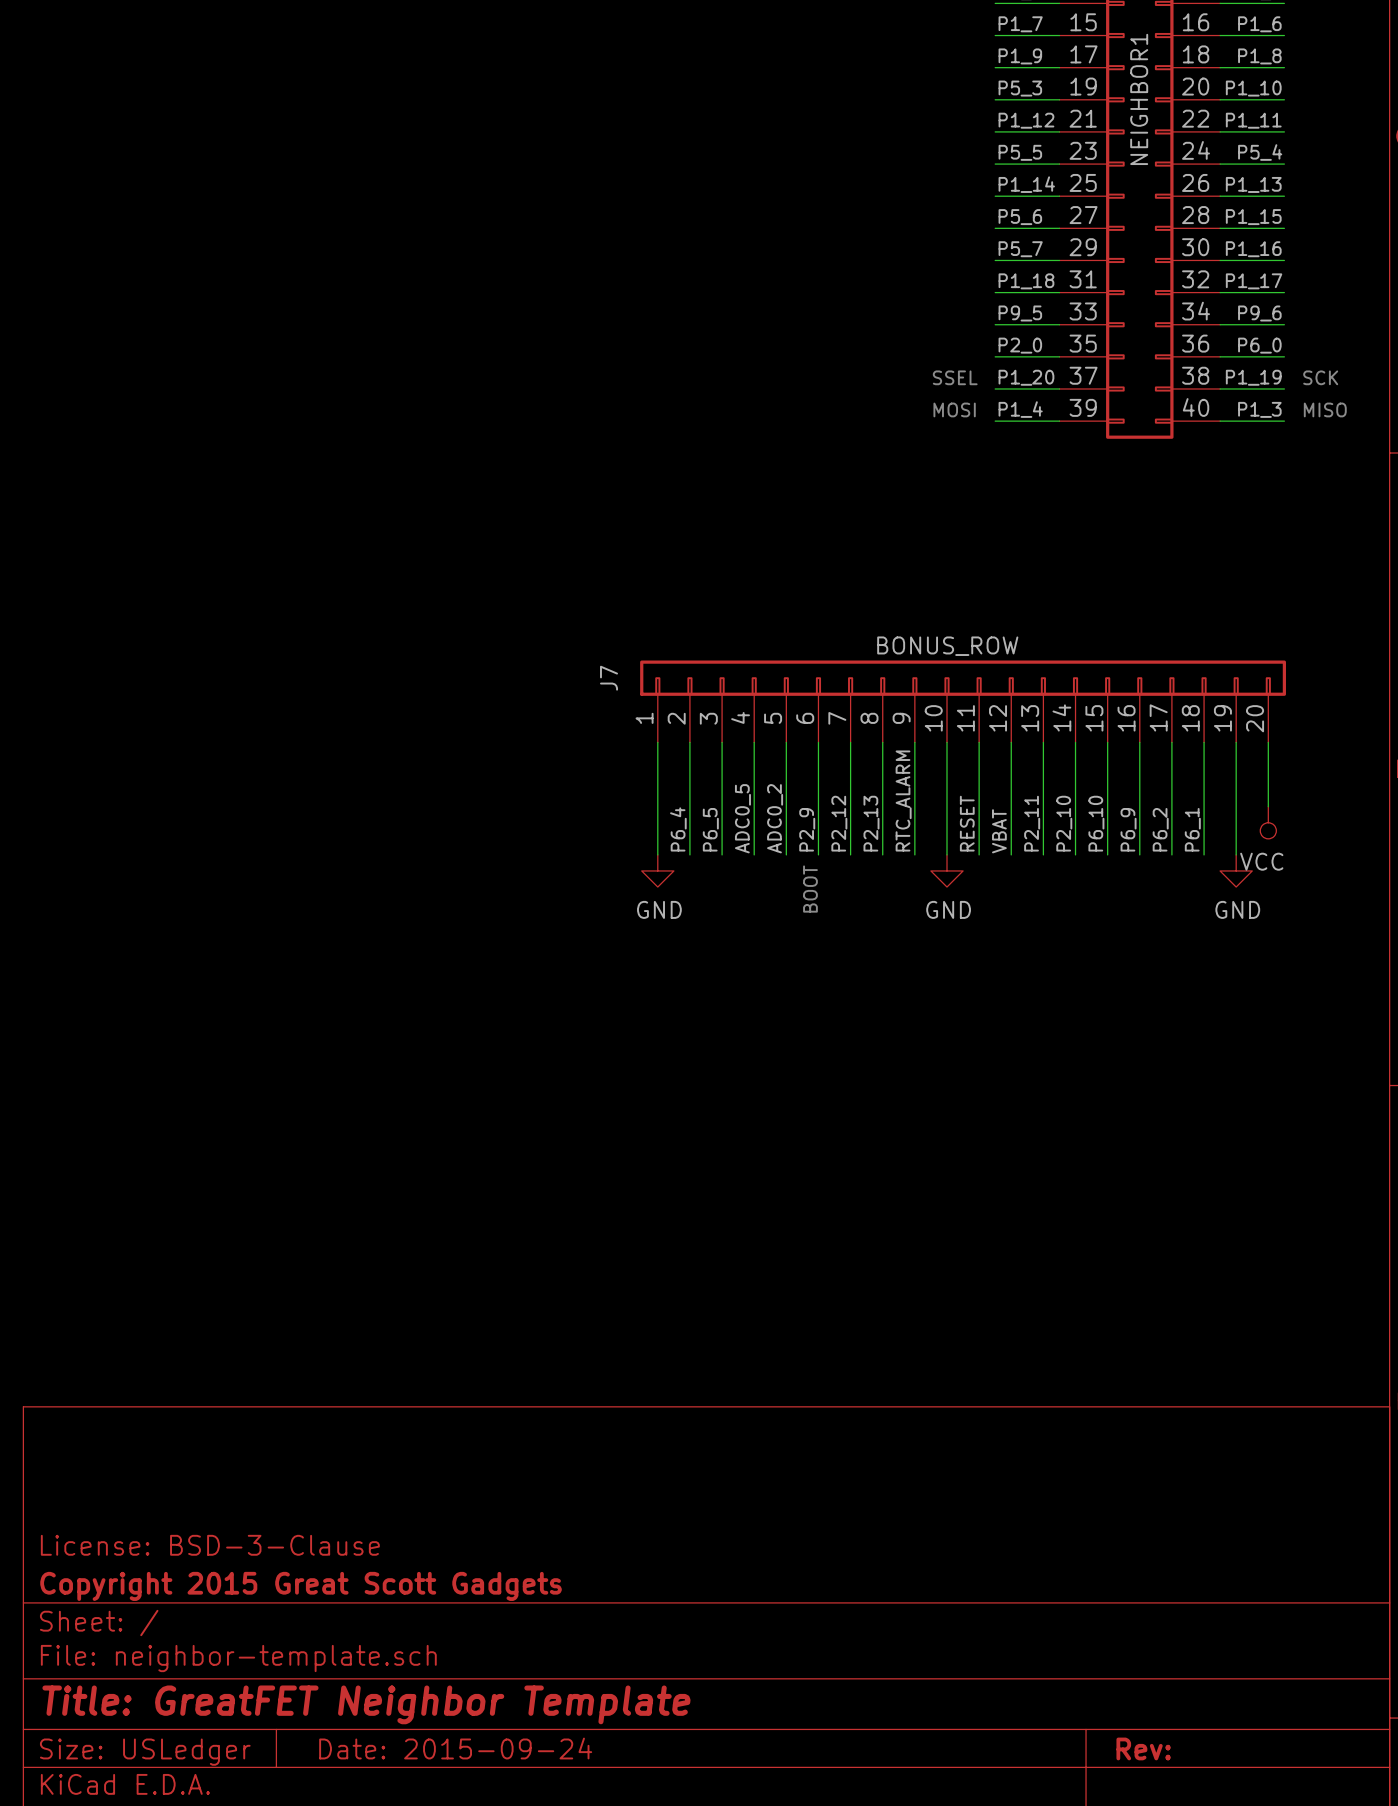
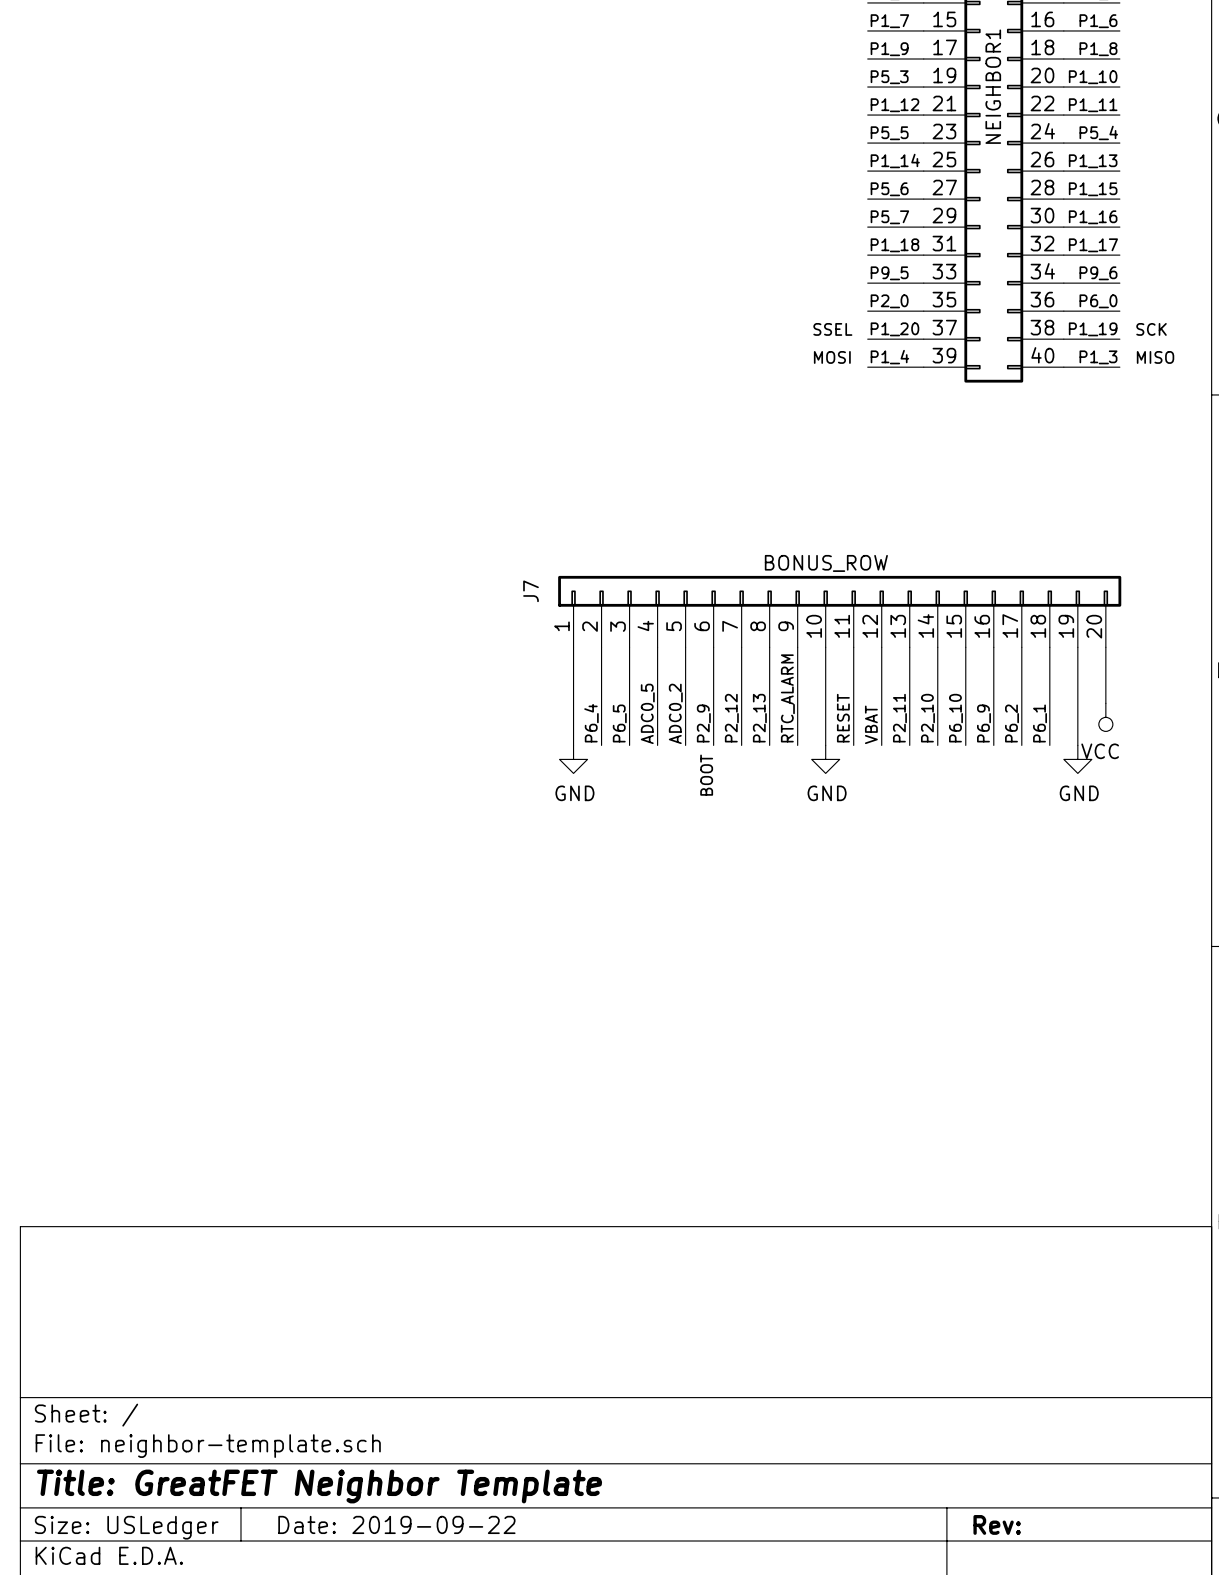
title block: License: BSD-3-Clause (210, 1545) -> none
title block: Copyright 2015 Great Scott Gadgets (301, 1586) -> none
title block: Date: 2015-09-24 (455, 1748) -> Date: 2019-09-22 (396, 1524)

